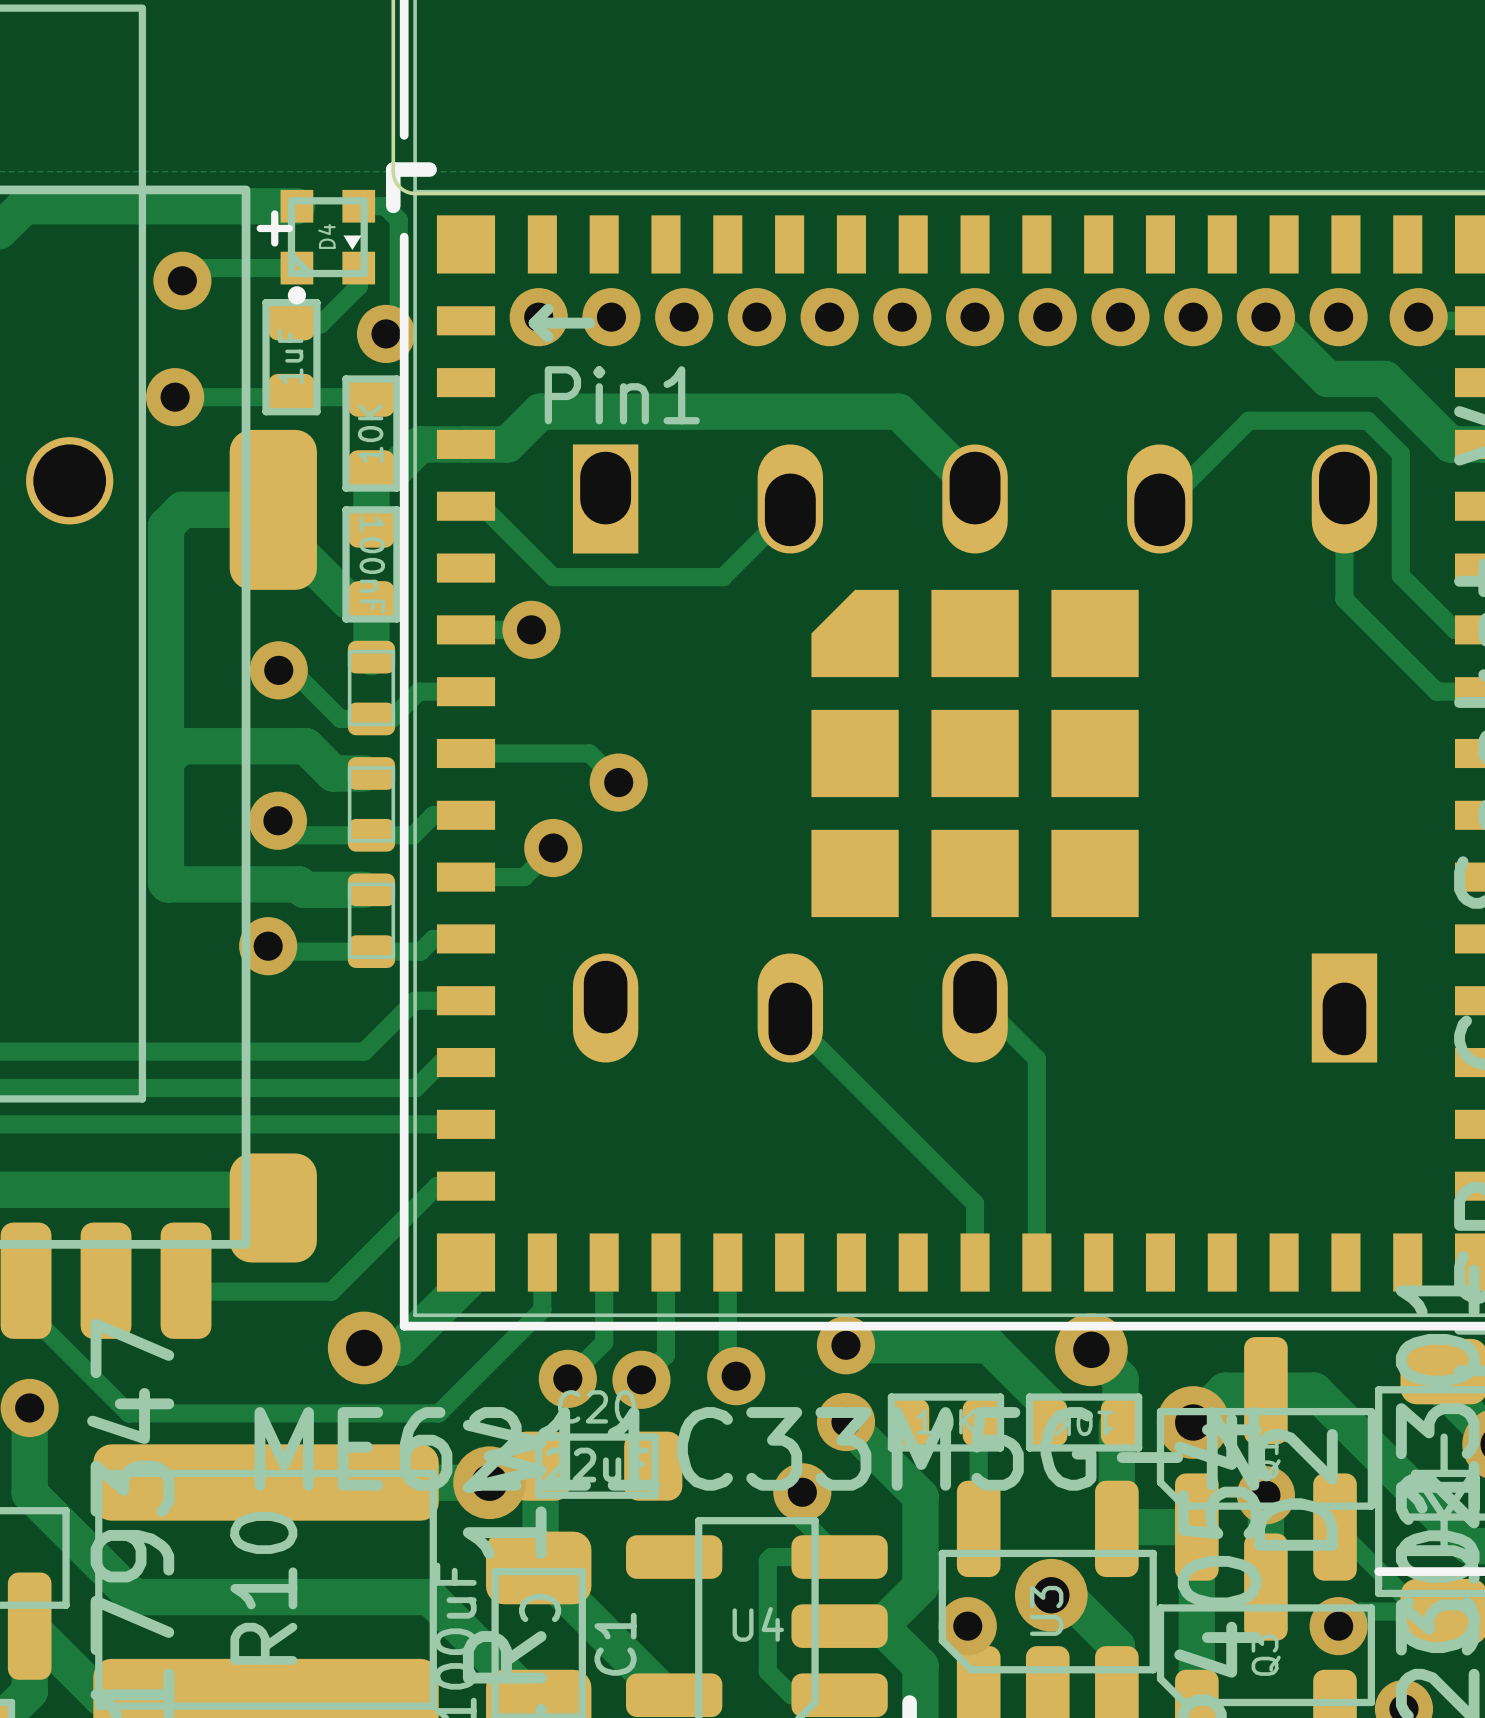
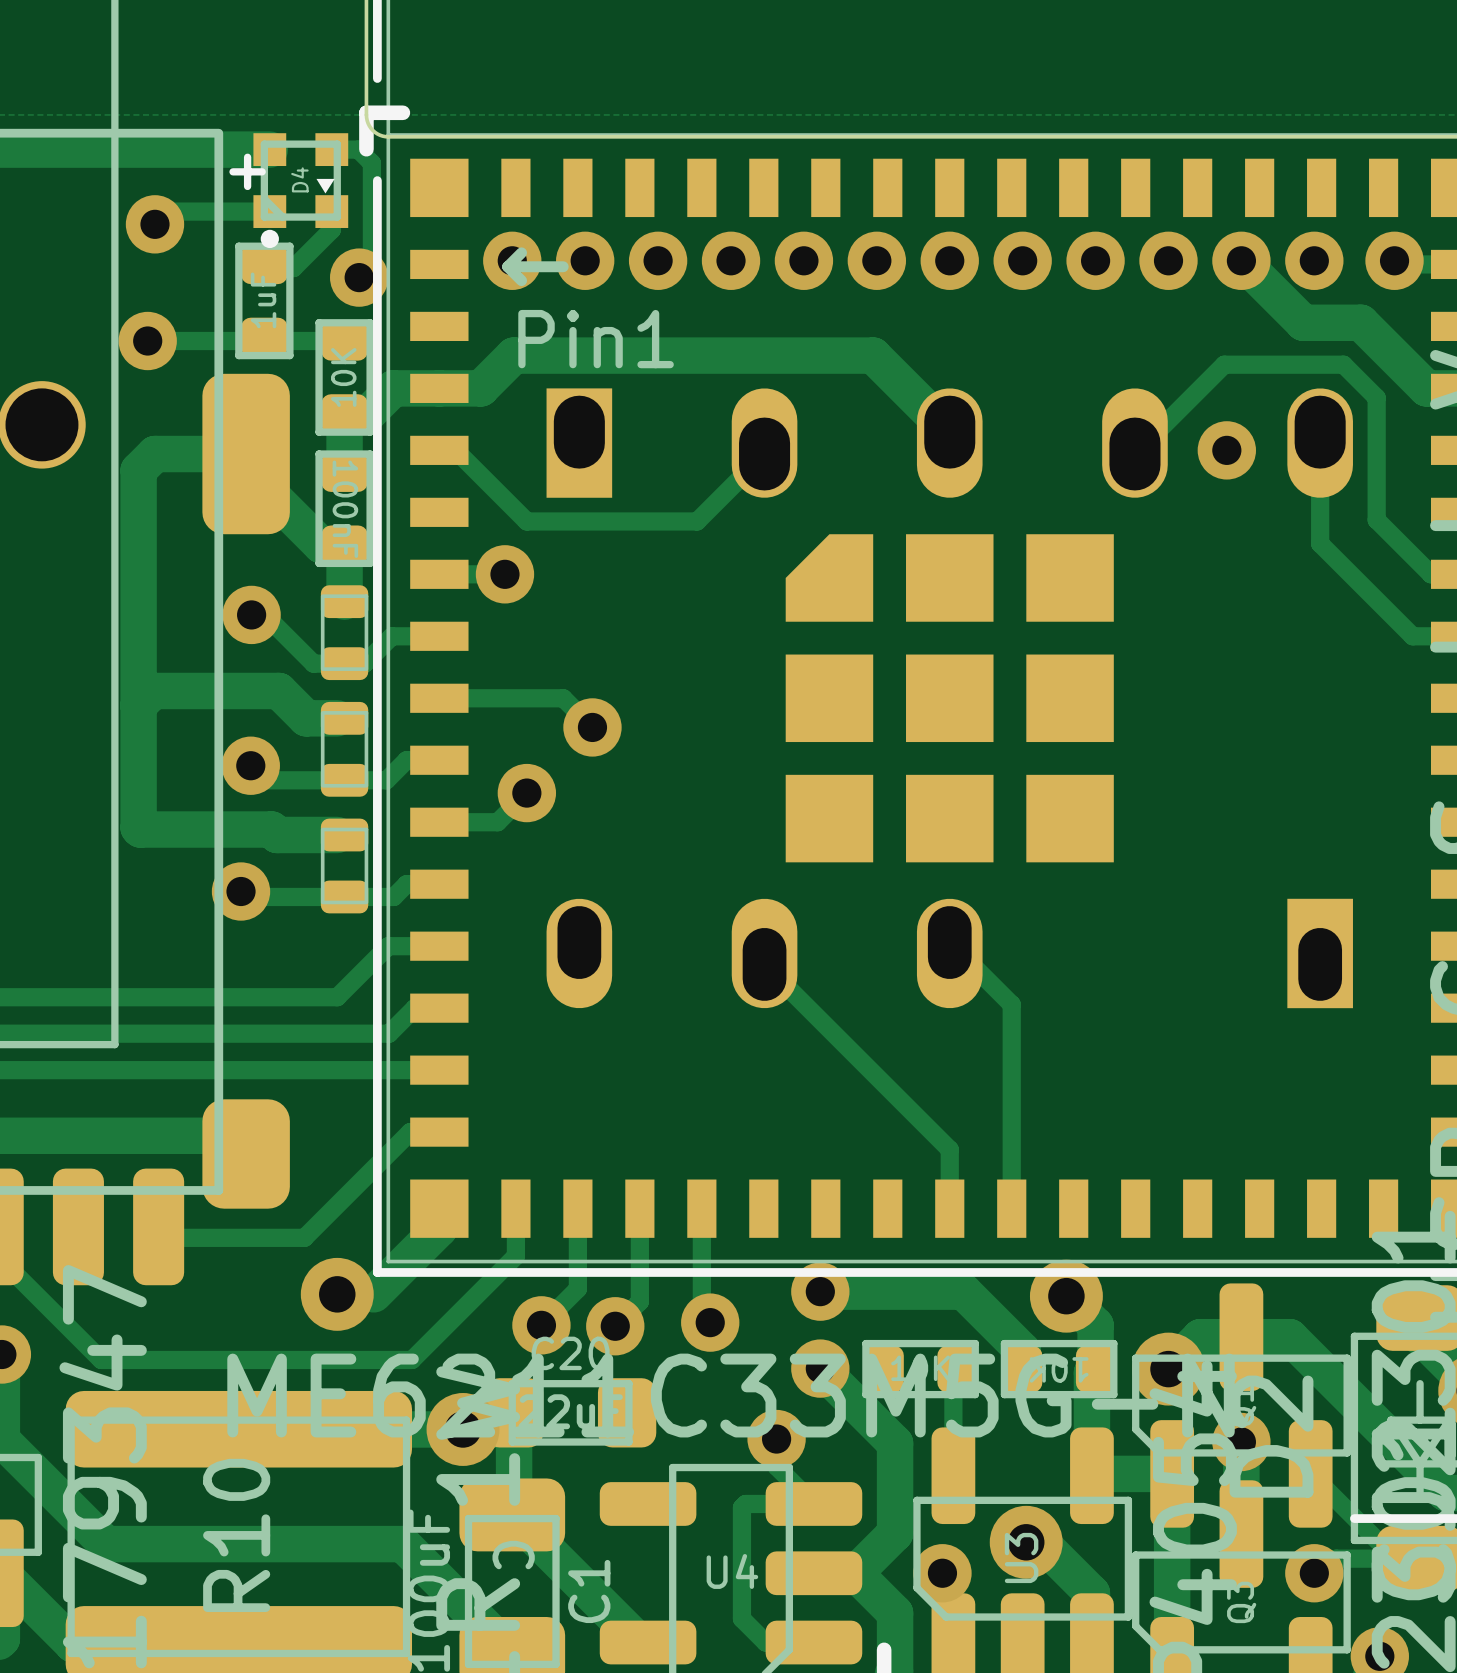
via: none -> (1226, 450)

